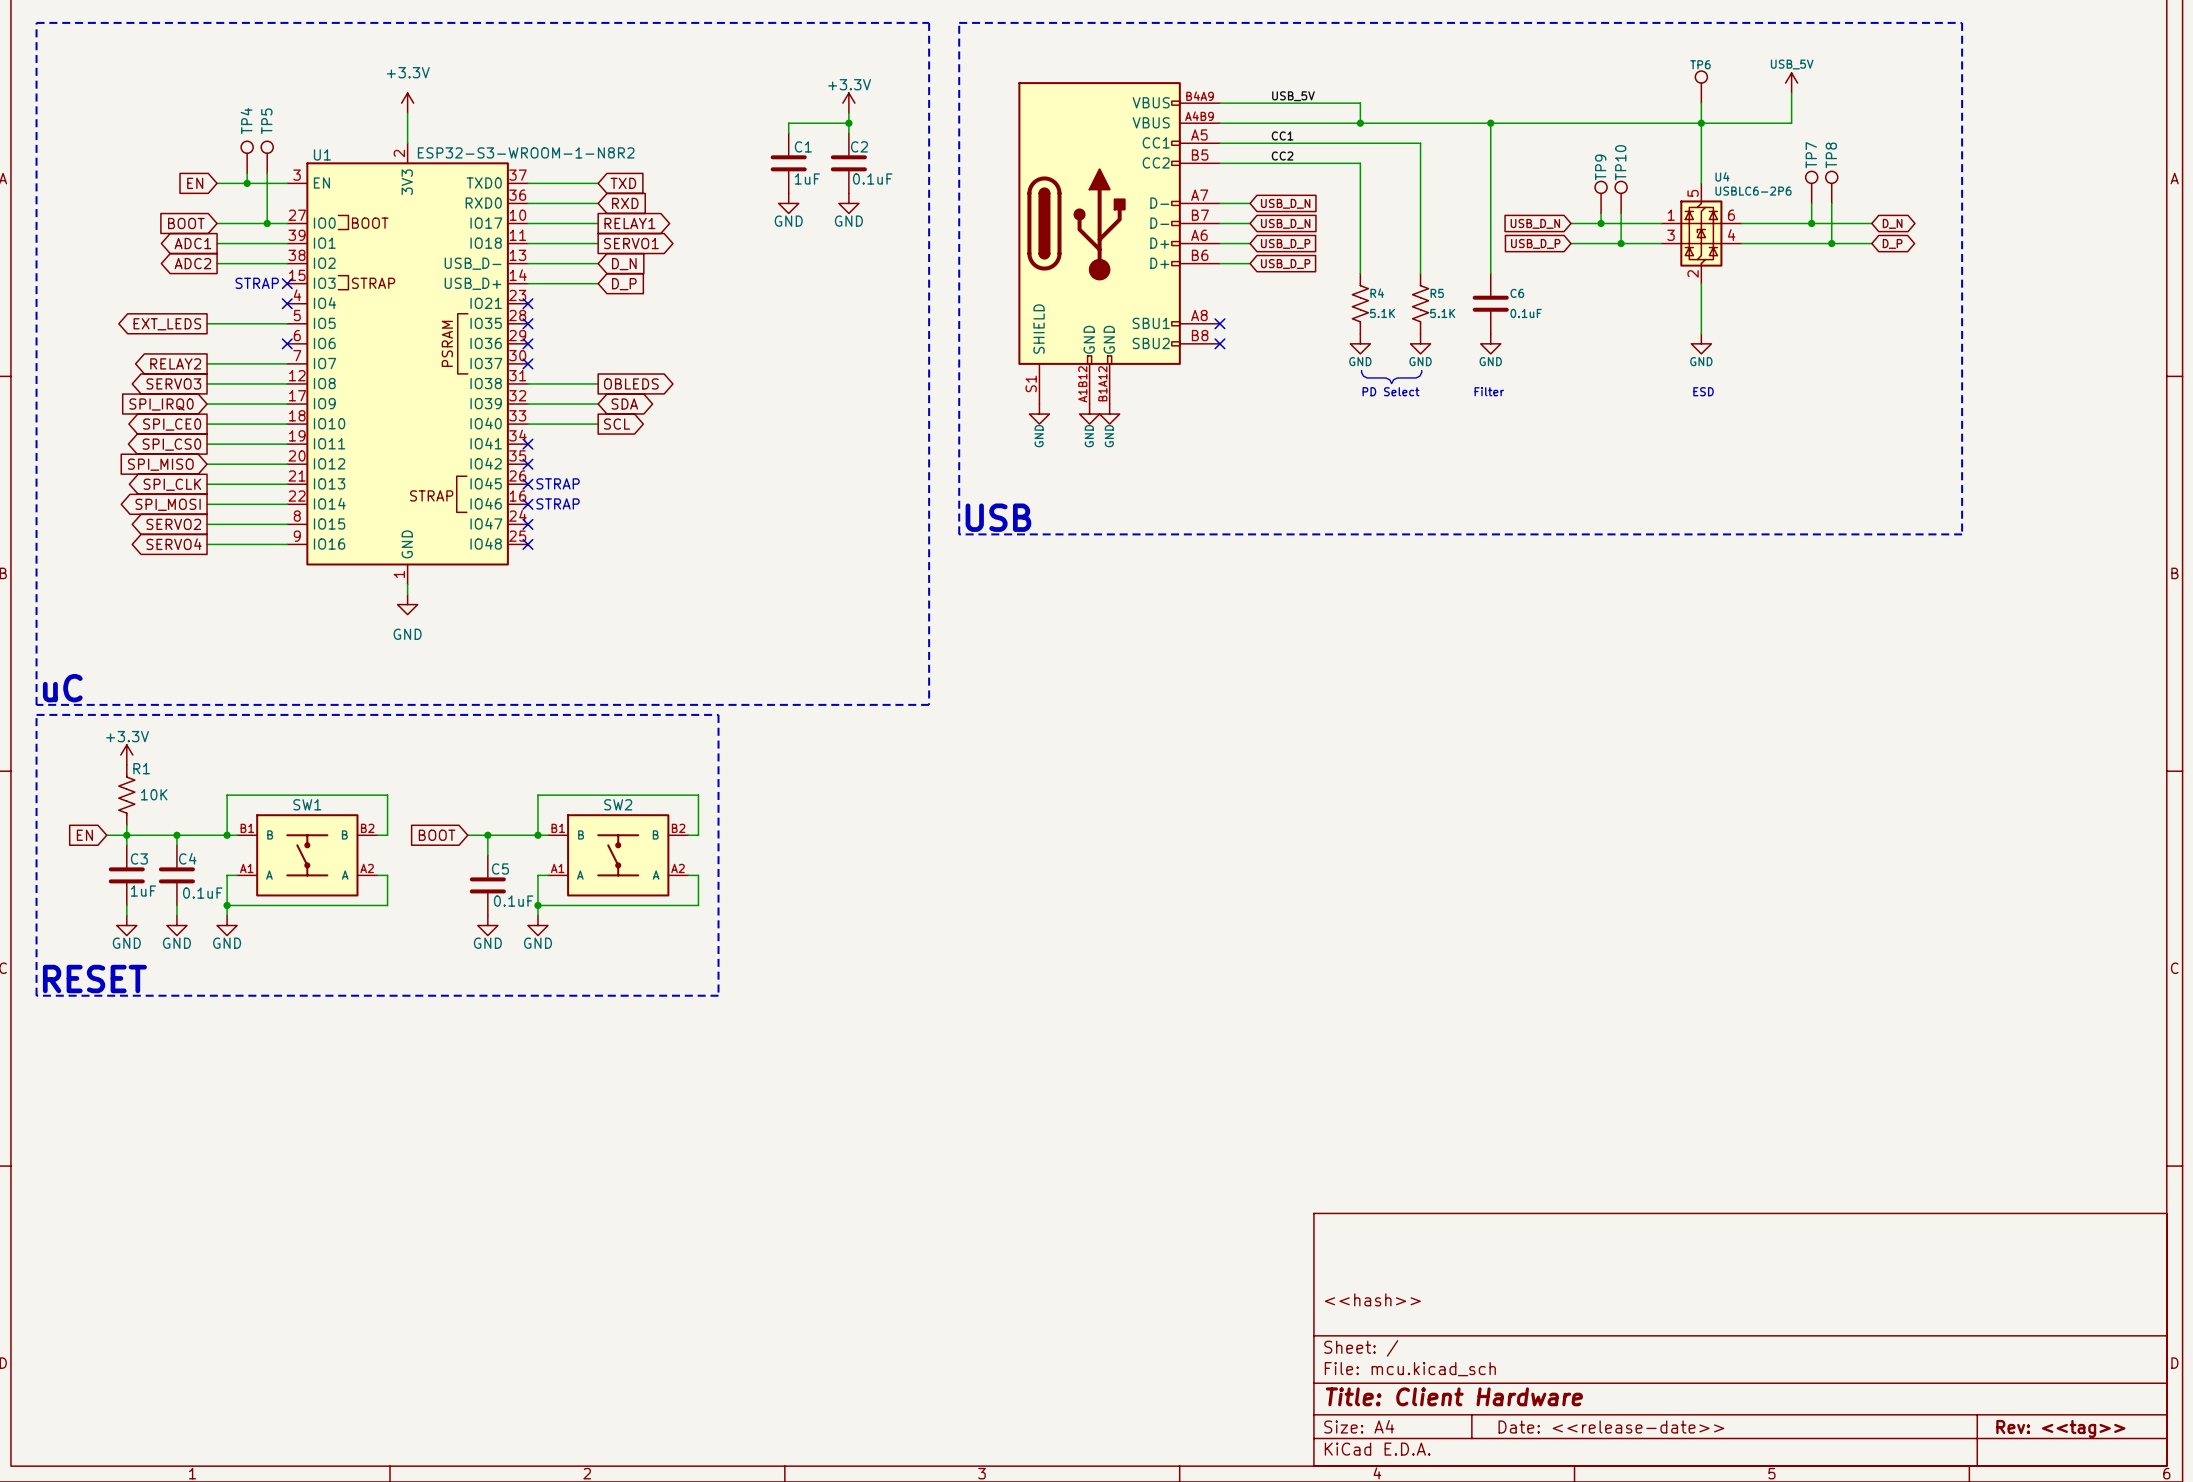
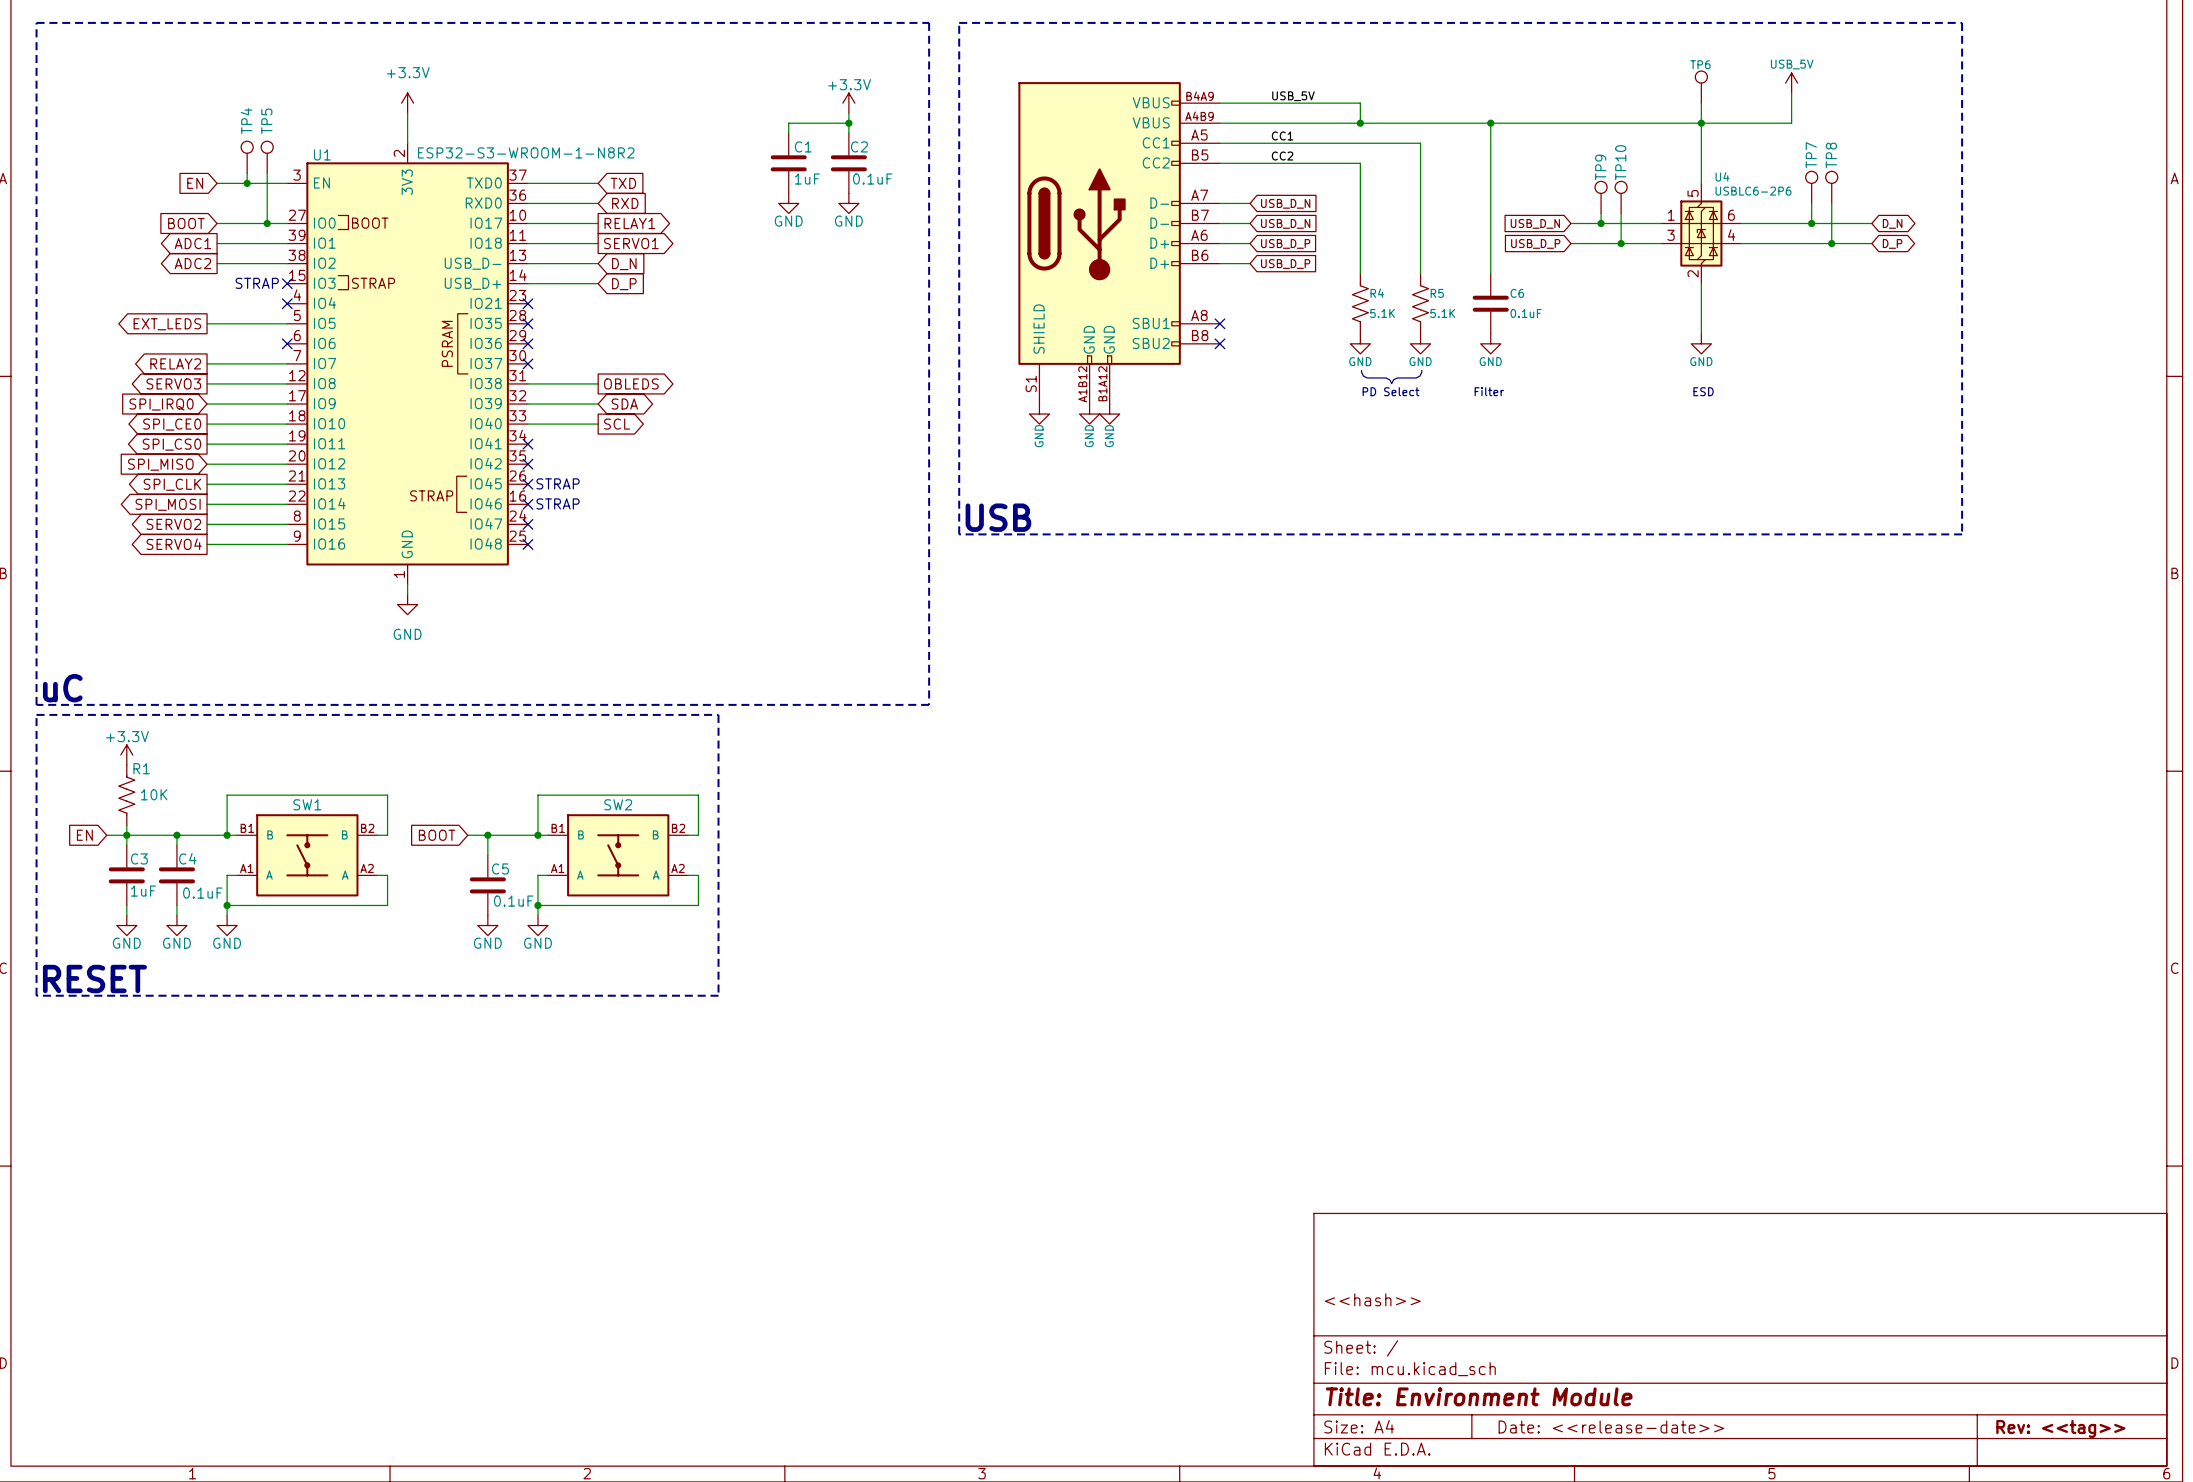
title block: Title: Client Hardware (1454, 1396) -> Title: Environment Module (1479, 1396)

